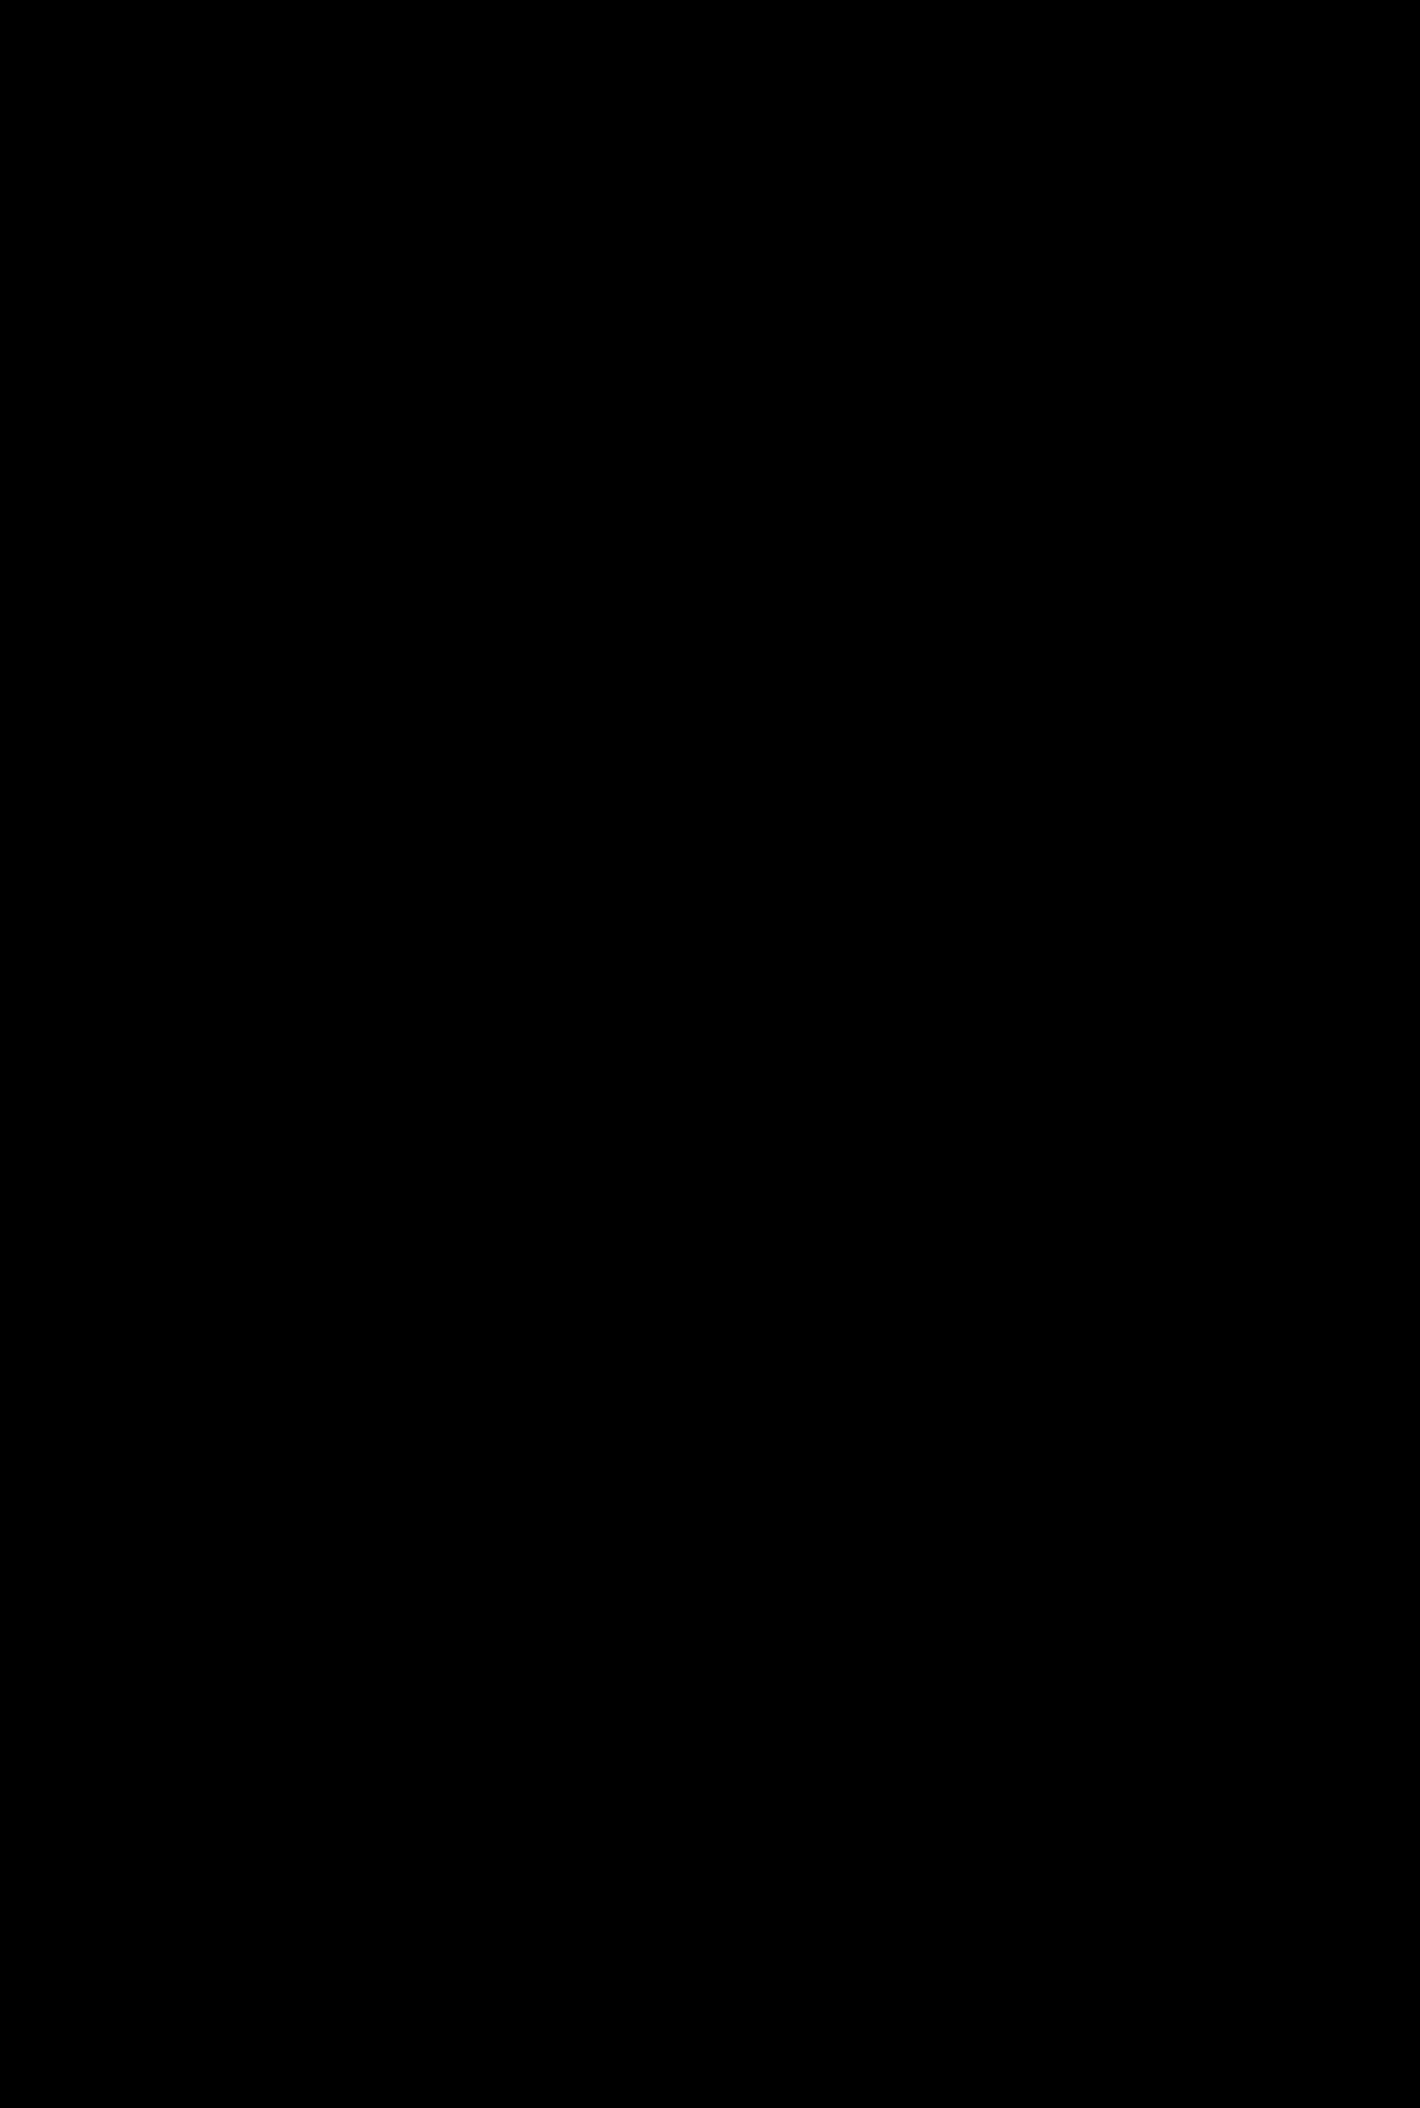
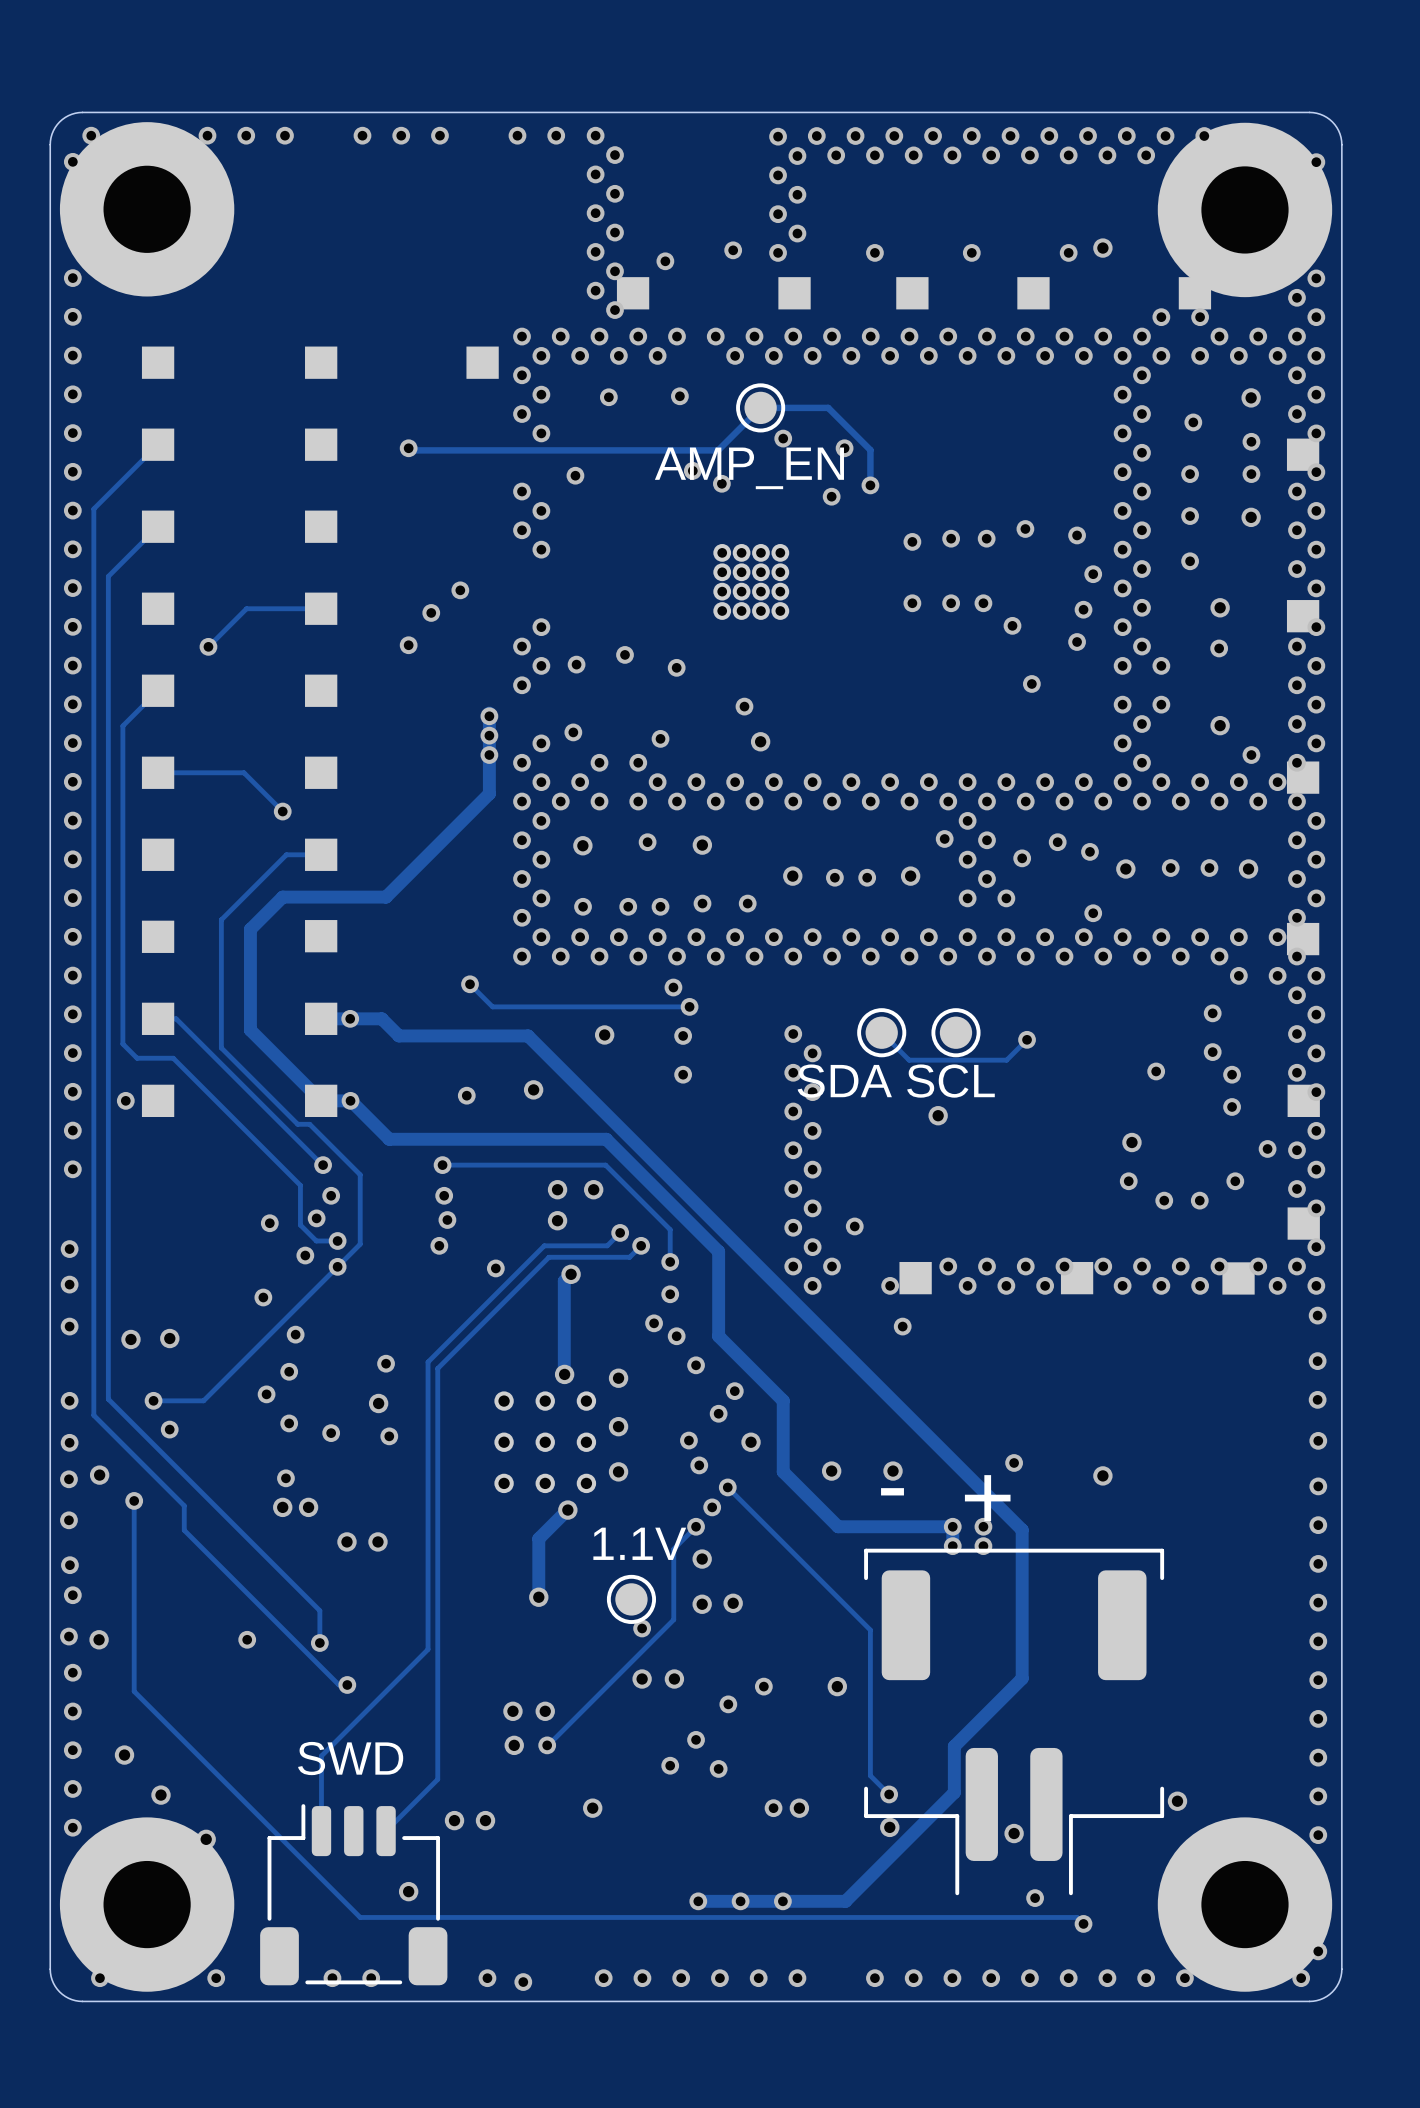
board edge: none -> (1309, 112) (82, 112) (68, 115) (55, 127) (50, 144) (50, 1969) (53, 1983) (65, 1996) (82, 2001) (1309, 2001) (1326, 1996) (1336, 1986) (1341, 1969) (1341, 144) (1338, 130) (1332, 121) (1320, 114) (1309, 112)
via: none -> (91, 135)
via: none -> (207, 135)
via: none -> (246, 135)
via: none -> (284, 135)
via: none -> (362, 135)
via: none -> (401, 135)
via: none -> (439, 135)
via: none -> (517, 135)
via: none -> (556, 135)
via: none -> (595, 135)
via: none -> (778, 136)
via: none -> (816, 136)
via: none -> (855, 136)
via: none -> (894, 136)
via: none -> (933, 136)
via: none -> (971, 136)
via: none -> (1010, 136)
via: none -> (1049, 136)
via: none -> (1088, 136)
via: none -> (1126, 136)
via: none -> (1165, 136)
via: none -> (1204, 136)
via: none -> (614, 155)
via: none -> (836, 155)
via: none -> (874, 155)
via: none -> (913, 155)
via: none -> (952, 155)
via: none -> (991, 155)
via: none -> (1029, 155)
via: none -> (1068, 155)
via: none -> (1107, 155)
via: none -> (1146, 155)
via: none -> (797, 156)
via: none -> (72, 161)
via: none -> (1316, 162)
via: none -> (595, 174)
via: none -> (778, 175)
via: none -> (614, 193)
via: none -> (797, 194)
part: none -> (147, 209)
part: none -> (1244, 209)
via: none -> (595, 213)
via: none -> (778, 214)
via: none -> (614, 232)
via: none -> (797, 233)
via: none -> (1102, 248)
via: none -> (733, 250)
via: none -> (595, 251)
via: none -> (778, 252)
via: none -> (874, 252)
via: none -> (971, 252)
via: none -> (1068, 252)
via: none -> (665, 261)
via: none -> (614, 271)
via: none -> (72, 278)
via: none -> (1316, 278)
via: none -> (595, 290)
part: none -> (633, 293)
part: none -> (794, 293)
part: none -> (912, 293)
part: none -> (1033, 293)
part: none -> (1194, 293)
via: none -> (1296, 297)
via: none -> (614, 310)
via: none -> (72, 316)
via: none -> (1161, 317)
via: none -> (1200, 317)
via: none -> (1316, 317)
via: none -> (522, 336)
via: none -> (560, 336)
via: none -> (599, 336)
via: none -> (638, 336)
via: none -> (676, 336)
via: none -> (715, 336)
via: none -> (754, 336)
via: none -> (793, 336)
via: none -> (831, 336)
via: none -> (870, 336)
via: none -> (909, 336)
via: none -> (948, 336)
via: none -> (986, 336)
via: none -> (1025, 336)
via: none -> (1064, 336)
via: none -> (1103, 336)
via: none -> (1141, 336)
via: none -> (1219, 336)
via: none -> (1258, 336)
via: none -> (1296, 336)
via: none -> (72, 355)
via: none -> (541, 355)
via: none -> (580, 355)
via: none -> (618, 355)
via: none -> (657, 355)
via: none -> (735, 355)
via: none -> (773, 355)
via: none -> (812, 355)
via: none -> (851, 355)
via: none -> (890, 355)
via: none -> (928, 355)
via: none -> (967, 355)
via: none -> (1006, 355)
via: none -> (1045, 355)
via: none -> (1083, 355)
via: none -> (1122, 355)
via: none -> (1161, 355)
via: none -> (1200, 355)
via: none -> (1238, 355)
via: none -> (1277, 355)
via: none -> (1316, 355)
part: none -> (158, 362)
part: none -> (321, 362)
part: none -> (482, 362)
via: none -> (522, 375)
via: none -> (1141, 375)
via: none -> (1296, 375)
via: none -> (72, 394)
via: none -> (541, 394)
via: none -> (1122, 394)
via: none -> (1316, 394)
via: none -> (679, 396)
via: none -> (608, 397)
via: none -> (1251, 397)
part: none -> (760, 407)
via: none -> (522, 414)
via: none -> (1141, 414)
via: none -> (1296, 414)
via: none -> (1193, 422)
via: none -> (72, 433)
via: none -> (541, 433)
via: none -> (1122, 433)
via: none -> (1316, 433)
via: none -> (783, 438)
via: none -> (1251, 441)
track: none -> (158, 444) (93, 508) (93, 1415) (184, 1505) (184, 1530) (338, 1684) (347, 1684)
part: none -> (158, 444)
part: none -> (321, 444)
track: none -> (408, 448) (410, 450) (718, 450) (760, 407) (828, 407) (870, 450) (870, 485)
via: none -> (408, 448)
via: none -> (844, 448)
via: none -> (1141, 452)
part: none -> (1303, 454)
text: none -> AMP_EN (749, 468)
via: none -> (692, 470)
via: none -> (72, 471)
via: none -> (1122, 472)
via: none -> (1316, 472)
via: none -> (1190, 474)
via: none -> (1251, 474)
via: none -> (575, 475)
via: none -> (721, 483)
via: none -> (870, 485)
via: none -> (522, 491)
via: none -> (1141, 491)
via: none -> (1296, 491)
via: none -> (831, 496)
via: none -> (72, 510)
via: none -> (541, 510)
via: none -> (1122, 510)
via: none -> (1316, 510)
via: none -> (1190, 516)
via: none -> (1251, 517)
track: none -> (158, 526) (108, 576) (108, 1399) (319, 1610) (319, 1643)
part: none -> (158, 526)
part: none -> (321, 526)
via: none -> (1025, 528)
via: none -> (522, 530)
via: none -> (1141, 530)
via: none -> (1296, 530)
via: none -> (1077, 535)
via: none -> (951, 538)
via: none -> (986, 538)
via: none -> (912, 541)
via: none -> (72, 549)
via: none -> (541, 549)
via: none -> (1122, 549)
via: none -> (1316, 549)
via: none -> (1190, 561)
via: none -> (1141, 569)
via: none -> (1296, 569)
via: none -> (1093, 574)
part: none -> (751, 581)
via: none -> (72, 588)
via: none -> (1122, 588)
via: none -> (1316, 588)
via: none -> (460, 590)
via: none -> (912, 603)
via: none -> (951, 603)
via: none -> (983, 603)
via: none -> (1141, 607)
via: none -> (1220, 607)
part: none -> (158, 608)
track: none -> (321, 608) (246, 608) (208, 646)
part: none -> (321, 608)
via: none -> (1083, 609)
via: none -> (431, 612)
part: none -> (1303, 616)
via: none -> (1012, 625)
via: none -> (72, 626)
via: none -> (541, 627)
via: none -> (1122, 627)
via: none -> (1316, 627)
via: none -> (1077, 642)
via: none -> (408, 645)
via: none -> (208, 646)
via: none -> (522, 646)
via: none -> (1141, 646)
via: none -> (1296, 646)
via: none -> (1219, 648)
via: none -> (625, 654)
via: none -> (576, 664)
via: none -> (72, 665)
via: none -> (541, 665)
via: none -> (1122, 665)
via: none -> (1161, 665)
via: none -> (1316, 665)
via: none -> (676, 667)
via: none -> (1031, 683)
via: none -> (522, 685)
via: none -> (1296, 685)
track: none -> (158, 690) (122, 725) (122, 1044) (137, 1058) (173, 1058) (300, 1185) (300, 1225) (316, 1240) (337, 1240)
part: none -> (158, 690)
part: none -> (321, 690)
via: none -> (72, 704)
via: none -> (1122, 704)
via: none -> (1161, 704)
via: none -> (1316, 704)
via: none -> (744, 706)
track: none -> (489, 713) (489, 793) (386, 897) (282, 897) (250, 929) (250, 1030) (321, 1100) (350, 1100) (389, 1139) (606, 1139) (718, 1251) (718, 1336) (783, 1400) (783, 1471) (838, 1526) (952, 1526) (952, 1546)
via: none -> (489, 716)
via: none -> (1141, 724)
via: none -> (1296, 724)
via: none -> (1220, 725)
via: none -> (573, 732)
via: none -> (489, 735)
via: none -> (660, 738)
via: none -> (760, 741)
via: none -> (72, 743)
via: none -> (541, 743)
via: none -> (1122, 743)
via: none -> (1316, 743)
via: none -> (489, 755)
via: none -> (1251, 755)
via: none -> (522, 762)
via: none -> (599, 762)
via: none -> (638, 762)
via: none -> (1141, 762)
via: none -> (1296, 762)
track: none -> (158, 772) (243, 772) (282, 811)
part: none -> (158, 772)
part: none -> (321, 772)
part: none -> (1303, 777)
via: none -> (72, 781)
via: none -> (541, 782)
via: none -> (580, 782)
via: none -> (657, 782)
via: none -> (696, 782)
via: none -> (735, 782)
via: none -> (773, 782)
via: none -> (812, 782)
via: none -> (851, 782)
via: none -> (890, 782)
via: none -> (928, 782)
via: none -> (967, 782)
via: none -> (1006, 782)
via: none -> (1045, 782)
via: none -> (1083, 782)
via: none -> (1122, 782)
via: none -> (1161, 782)
via: none -> (1200, 782)
via: none -> (1238, 782)
via: none -> (1277, 782)
via: none -> (522, 801)
via: none -> (560, 801)
via: none -> (599, 801)
via: none -> (638, 801)
via: none -> (677, 801)
via: none -> (715, 801)
via: none -> (754, 801)
via: none -> (793, 801)
via: none -> (832, 801)
via: none -> (870, 801)
via: none -> (909, 801)
via: none -> (948, 801)
via: none -> (987, 801)
via: none -> (1025, 801)
via: none -> (1064, 801)
via: none -> (1103, 801)
via: none -> (1141, 801)
via: none -> (1180, 801)
via: none -> (1219, 801)
via: none -> (1258, 801)
via: none -> (1296, 801)
via: none -> (282, 811)
via: none -> (72, 820)
via: none -> (541, 820)
via: none -> (967, 820)
via: none -> (1316, 820)
via: none -> (944, 838)
via: none -> (522, 840)
via: none -> (987, 840)
via: none -> (1296, 840)
via: none -> (647, 842)
via: none -> (1057, 842)
via: none -> (582, 845)
via: none -> (702, 845)
via: none -> (1089, 851)
part: none -> (158, 854)
track: none -> (321, 854) (286, 854) (221, 919) (221, 1047) (297, 1124) (309, 1124) (360, 1174) (360, 1244) (203, 1400) (153, 1400)
part: none -> (321, 854)
via: none -> (1022, 858)
via: none -> (72, 859)
via: none -> (541, 859)
via: none -> (967, 859)
via: none -> (1316, 859)
via: none -> (1170, 868)
via: none -> (1209, 868)
via: none -> (1125, 869)
via: none -> (1248, 869)
via: none -> (792, 876)
via: none -> (910, 876)
via: none -> (834, 877)
via: none -> (867, 877)
via: none -> (522, 879)
via: none -> (987, 879)
via: none -> (1296, 879)
via: none -> (72, 898)
via: none -> (541, 898)
via: none -> (967, 898)
via: none -> (1006, 898)
via: none -> (1316, 898)
via: none -> (702, 903)
via: none -> (747, 903)
via: none -> (583, 906)
via: none -> (628, 906)
via: none -> (660, 906)
via: none -> (1093, 913)
via: none -> (522, 917)
via: none -> (1296, 917)
via: none -> (72, 936)
part: none -> (158, 936)
part: none -> (321, 936)
via: none -> (541, 937)
via: none -> (580, 937)
via: none -> (618, 937)
via: none -> (657, 937)
via: none -> (696, 937)
via: none -> (735, 937)
via: none -> (773, 937)
via: none -> (812, 937)
via: none -> (851, 937)
via: none -> (890, 937)
via: none -> (928, 937)
via: none -> (967, 937)
via: none -> (1006, 937)
via: none -> (1045, 937)
via: none -> (1083, 937)
via: none -> (1122, 937)
via: none -> (1161, 937)
via: none -> (1200, 937)
via: none -> (1238, 937)
via: none -> (1277, 937)
part: none -> (1303, 939)
via: none -> (522, 956)
via: none -> (560, 956)
via: none -> (599, 956)
via: none -> (638, 956)
via: none -> (677, 956)
via: none -> (715, 956)
via: none -> (754, 956)
via: none -> (793, 956)
via: none -> (832, 956)
via: none -> (870, 956)
via: none -> (909, 956)
via: none -> (948, 956)
via: none -> (987, 956)
via: none -> (1025, 956)
via: none -> (1064, 956)
via: none -> (1103, 956)
via: none -> (1141, 956)
via: none -> (1180, 956)
via: none -> (1219, 956)
via: none -> (1296, 956)
via: none -> (72, 975)
via: none -> (1238, 975)
via: none -> (1277, 975)
via: none -> (1316, 975)
track: none -> (470, 984) (492, 1006) (689, 1006)
via: none -> (470, 984)
via: none -> (673, 987)
via: none -> (1296, 995)
via: none -> (689, 1006)
via: none -> (1212, 1013)
via: none -> (72, 1014)
via: none -> (1316, 1014)
track: none -> (158, 1018) (176, 1018) (322, 1165)
part: none -> (158, 1018)
track: none -> (321, 1018) (381, 1018) (398, 1035) (528, 1035) (1022, 1529) (1022, 1678) (954, 1746) (954, 1792) (845, 1901) (698, 1901)
part: none -> (321, 1018)
via: none -> (350, 1018)
track: none -> (881, 1032) (909, 1060) (1006, 1060) (1027, 1039)
part: none -> (881, 1032)
part: none -> (955, 1032)
via: none -> (604, 1034)
via: none -> (793, 1034)
via: none -> (1296, 1034)
via: none -> (683, 1035)
via: none -> (1027, 1039)
via: none -> (1212, 1052)
via: none -> (72, 1053)
via: none -> (812, 1053)
via: none -> (1316, 1053)
via: none -> (1156, 1071)
via: none -> (793, 1072)
via: none -> (1296, 1072)
via: none -> (683, 1074)
via: none -> (1232, 1074)
text: none -> SDA SCL (896, 1081)
via: none -> (533, 1089)
via: none -> (72, 1091)
via: none -> (812, 1092)
via: none -> (1316, 1092)
via: none -> (466, 1095)
via: none -> (125, 1100)
part: none -> (158, 1100)
part: none -> (321, 1100)
via: none -> (350, 1100)
part: none -> (1303, 1100)
via: none -> (1232, 1106)
via: none -> (793, 1111)
via: none -> (938, 1115)
via: none -> (72, 1130)
via: none -> (812, 1130)
via: none -> (1316, 1130)
via: none -> (1131, 1142)
via: none -> (1267, 1148)
via: none -> (793, 1150)
via: none -> (1296, 1150)
via: none -> (323, 1165)
track: none -> (442, 1165) (605, 1165) (670, 1229) (670, 1261)
via: none -> (442, 1165)
via: none -> (72, 1169)
via: none -> (812, 1169)
via: none -> (1316, 1169)
via: none -> (1128, 1181)
via: none -> (1235, 1181)
via: none -> (557, 1189)
via: none -> (593, 1189)
via: none -> (793, 1189)
via: none -> (1296, 1189)
via: none -> (331, 1195)
via: none -> (444, 1195)
via: none -> (1164, 1200)
via: none -> (1199, 1200)
via: none -> (812, 1208)
via: none -> (1316, 1208)
via: none -> (316, 1218)
via: none -> (447, 1220)
via: none -> (557, 1220)
via: none -> (269, 1223)
part: none -> (1303, 1223)
via: none -> (854, 1226)
via: none -> (793, 1227)
track: none -> (620, 1232) (607, 1245) (544, 1245) (428, 1362) (428, 1649) (321, 1756) (321, 1831)
via: none -> (620, 1232)
via: none -> (337, 1240)
via: none -> (439, 1245)
track: none -> (641, 1245) (629, 1257) (548, 1257) (437, 1368) (437, 1779) (386, 1831)
via: none -> (641, 1245)
via: none -> (812, 1247)
via: none -> (1316, 1247)
via: none -> (69, 1249)
via: none -> (305, 1255)
via: none -> (670, 1261)
via: none -> (337, 1266)
via: none -> (793, 1266)
via: none -> (832, 1266)
via: none -> (948, 1266)
via: none -> (987, 1266)
via: none -> (1025, 1266)
via: none -> (1064, 1266)
via: none -> (1103, 1266)
via: none -> (1141, 1266)
via: none -> (1180, 1266)
via: none -> (1219, 1266)
via: none -> (1258, 1266)
via: none -> (1296, 1266)
via: none -> (495, 1268)
track: none -> (571, 1274) (564, 1281) (564, 1374)
via: none -> (571, 1274)
part: none -> (915, 1278)
part: none -> (1077, 1278)
part: none -> (1238, 1278)
via: none -> (69, 1284)
via: none -> (812, 1285)
via: none -> (890, 1285)
via: none -> (967, 1285)
via: none -> (1006, 1285)
via: none -> (1045, 1285)
via: none -> (1122, 1285)
via: none -> (1161, 1285)
via: none -> (1200, 1285)
via: none -> (1277, 1285)
via: none -> (1316, 1285)
via: none -> (670, 1294)
via: none -> (263, 1297)
via: none -> (1317, 1315)
via: none -> (654, 1323)
via: none -> (69, 1326)
via: none -> (902, 1326)
via: none -> (295, 1334)
via: none -> (676, 1336)
via: none -> (169, 1338)
via: none -> (130, 1339)
via: none -> (1317, 1361)
via: none -> (386, 1363)
via: none -> (696, 1365)
via: none -> (289, 1371)
via: none -> (564, 1374)
via: none -> (618, 1378)
via: none -> (734, 1391)
via: none -> (266, 1394)
via: none -> (1317, 1399)
via: none -> (69, 1400)
via: none -> (153, 1400)
via: none -> (378, 1403)
via: none -> (718, 1413)
via: none -> (289, 1423)
via: none -> (618, 1426)
via: none -> (169, 1429)
via: none -> (331, 1433)
via: none -> (389, 1436)
via: none -> (688, 1440)
via: none -> (1318, 1440)
via: none -> (69, 1442)
part: none -> (545, 1442)
via: none -> (751, 1442)
via: none -> (1014, 1462)
via: none -> (699, 1465)
via: none -> (618, 1471)
via: none -> (831, 1471)
via: none -> (893, 1471)
via: none -> (99, 1475)
via: none -> (1102, 1475)
via: none -> (285, 1478)
via: none -> (68, 1479)
via: none -> (1318, 1486)
track: none -> (727, 1487) (870, 1630) (870, 1775) (889, 1794)
via: none -> (727, 1487)
text: none -> + - (945, 1498)
track: none -> (134, 1500) (134, 1691) (360, 1917) (1077, 1917) (1083, 1923)
via: none -> (134, 1500)
via: none -> (282, 1507)
via: none -> (308, 1507)
via: none -> (712, 1507)
track: none -> (567, 1510) (538, 1538) (538, 1597)
via: none -> (567, 1510)
via: none -> (68, 1520)
via: none -> (1318, 1525)
track: none -> (696, 1526) (673, 1549) (673, 1619) (547, 1745)
via: none -> (696, 1526)
via: none -> (952, 1526)
via: none -> (983, 1526)
via: none -> (346, 1541)
via: none -> (377, 1541)
text: none -> 1.1V (639, 1543)
via: none -> (952, 1546)
via: none -> (983, 1546)
via: none -> (702, 1559)
via: none -> (1318, 1563)
via: none -> (69, 1565)
via: none -> (72, 1595)
via: none -> (538, 1597)
part: none -> (631, 1599)
via: none -> (1318, 1602)
via: none -> (733, 1603)
via: none -> (702, 1604)
via: none -> (642, 1628)
via: none -> (68, 1636)
via: none -> (99, 1639)
via: none -> (247, 1639)
via: none -> (1318, 1641)
via: none -> (319, 1643)
via: none -> (72, 1672)
via: none -> (642, 1679)
via: none -> (674, 1679)
via: none -> (1318, 1680)
via: none -> (347, 1684)
via: none -> (763, 1686)
via: none -> (837, 1686)
via: none -> (728, 1704)
via: none -> (72, 1711)
via: none -> (512, 1711)
via: none -> (545, 1711)
via: none -> (1318, 1718)
part: none -> (1014, 1721)
via: none -> (696, 1739)
via: none -> (514, 1745)
via: none -> (547, 1745)
via: none -> (72, 1750)
via: none -> (124, 1755)
via: none -> (1318, 1757)
text: none -> SWD (350, 1758)
via: none -> (670, 1765)
via: none -> (718, 1768)
via: none -> (72, 1788)
via: none -> (889, 1794)
via: none -> (160, 1795)
via: none -> (1318, 1796)
via: none -> (1177, 1801)
via: none -> (592, 1808)
via: none -> (773, 1808)
via: none -> (799, 1808)
via: none -> (454, 1820)
via: none -> (485, 1820)
via: none -> (72, 1827)
via: none -> (889, 1827)
via: none -> (1014, 1833)
via: none -> (1318, 1835)
via: none -> (206, 1839)
via: none -> (408, 1891)
part: none -> (353, 1894)
via: none -> (1035, 1898)
via: none -> (698, 1901)
via: none -> (740, 1901)
via: none -> (782, 1901)
part: none -> (147, 1904)
part: none -> (1244, 1904)
via: none -> (1083, 1923)
via: none -> (1318, 1951)
via: none -> (99, 1978)
via: none -> (216, 1978)
via: none -> (332, 1978)
via: none -> (371, 1978)
via: none -> (487, 1978)
via: none -> (603, 1978)
via: none -> (642, 1978)
via: none -> (681, 1978)
via: none -> (719, 1978)
via: none -> (758, 1978)
via: none -> (797, 1978)
via: none -> (874, 1978)
via: none -> (913, 1978)
via: none -> (952, 1978)
via: none -> (991, 1978)
via: none -> (1029, 1978)
via: none -> (1068, 1978)
via: none -> (1107, 1978)
via: none -> (1146, 1978)
via: none -> (1184, 1978)
via: none -> (1301, 1978)
via: none -> (523, 1982)

